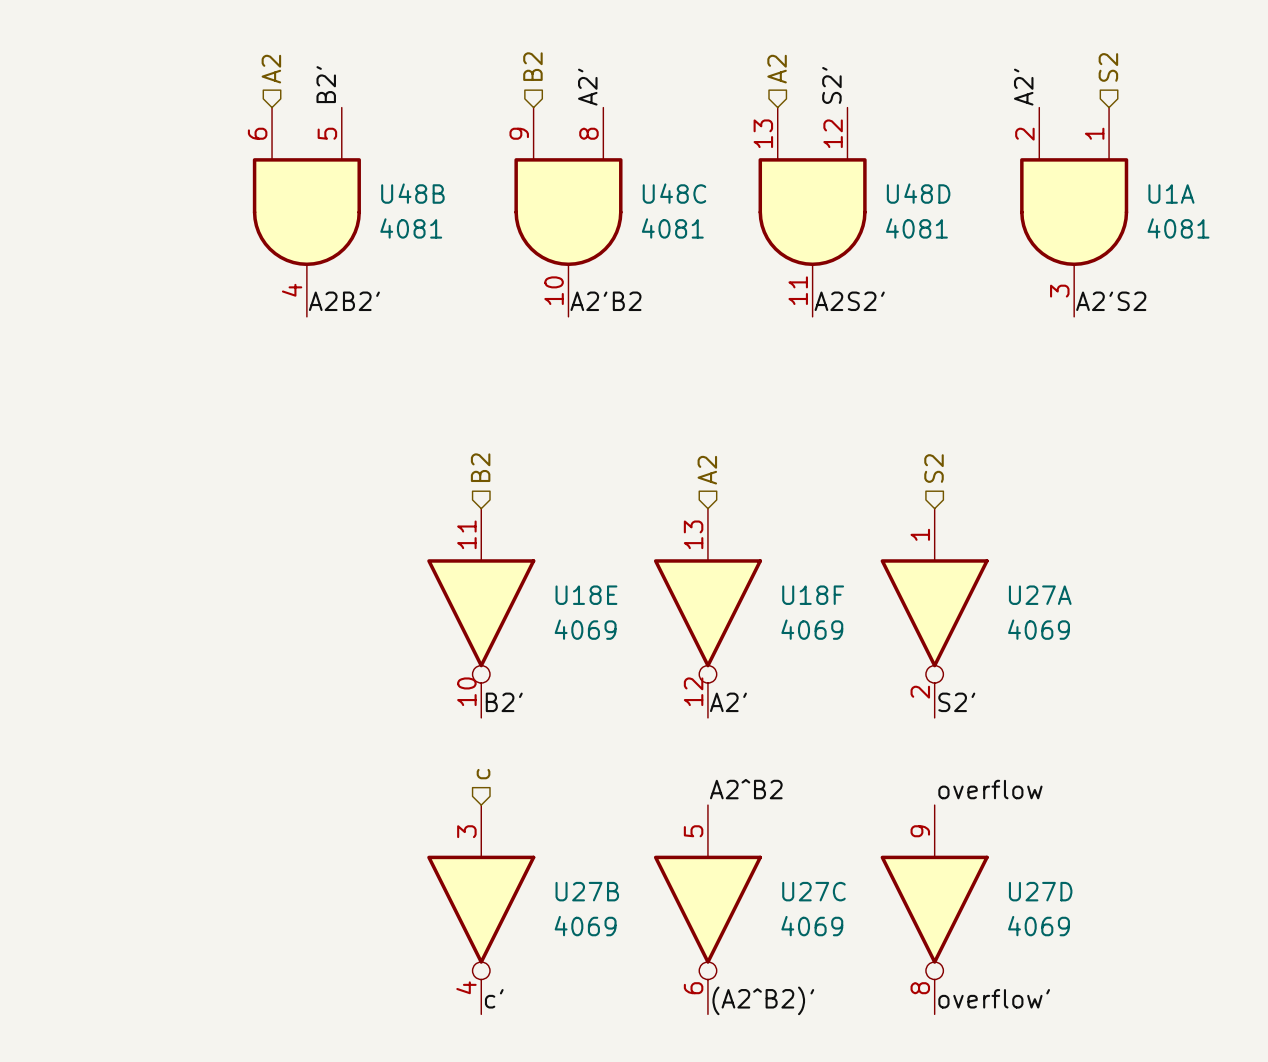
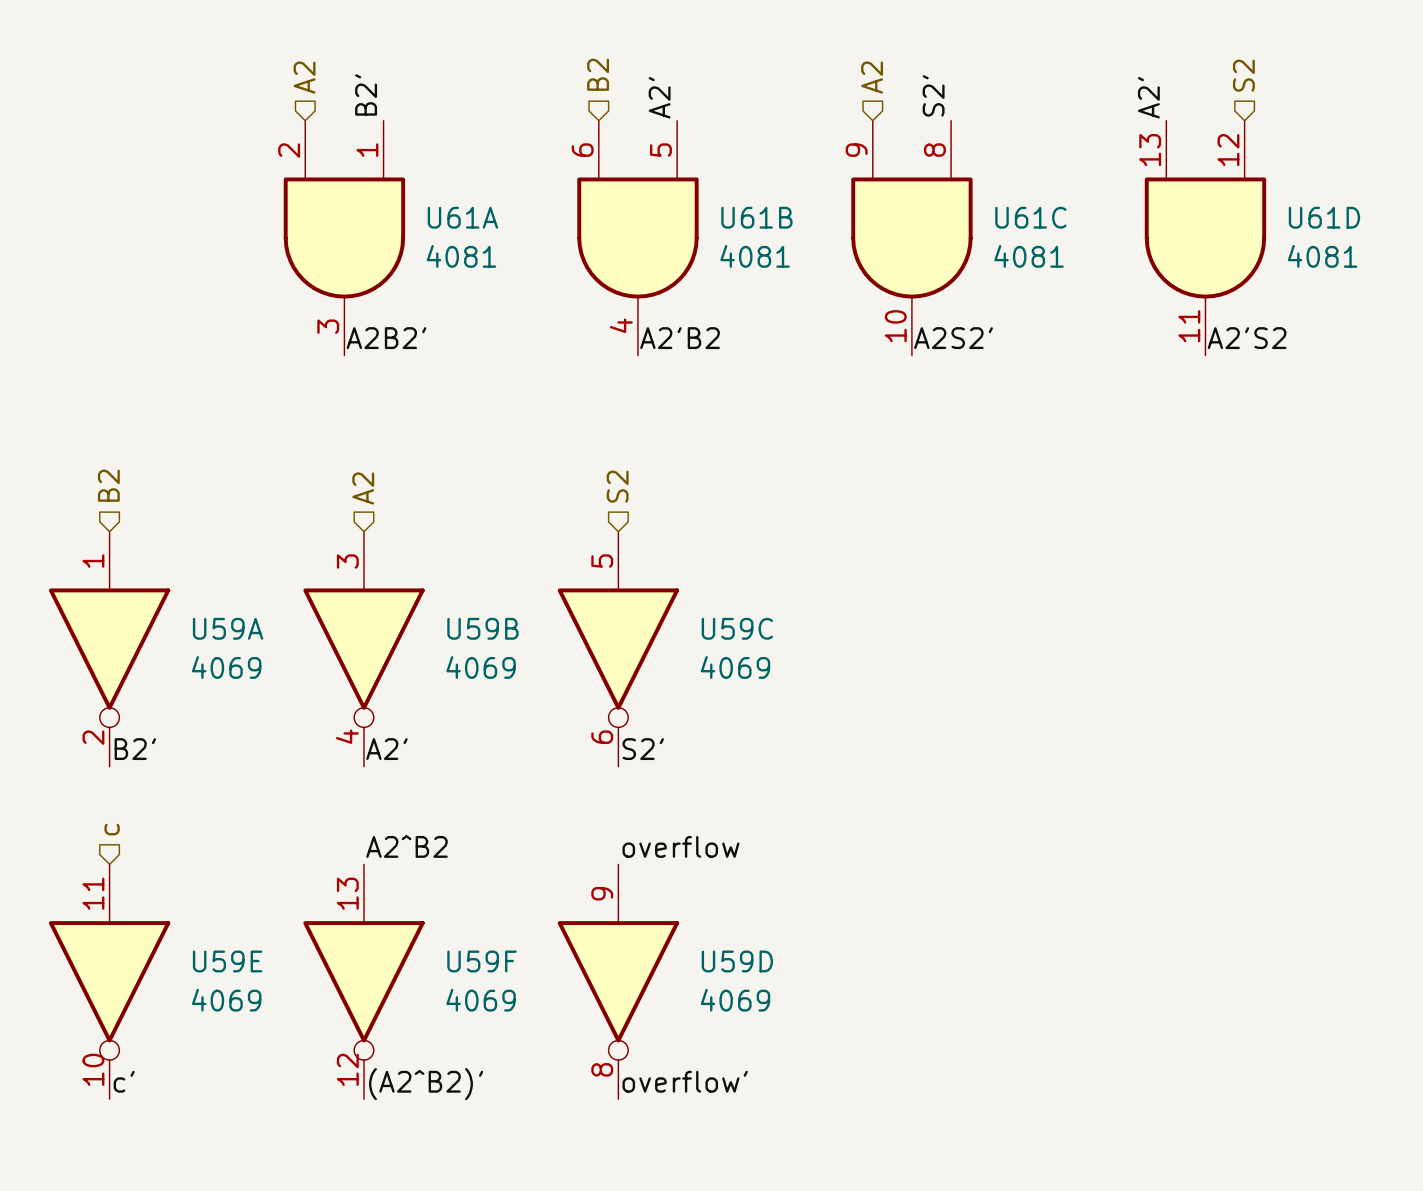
U48B pin number: 6 (257, 133) -> 2 (289, 150)
U48B pin number: 5 (327, 133) -> 1 (367, 150)
U48C pin number: 9 (519, 133) -> 6 (582, 150)
U48C pin number: 8 (588, 133) -> 5 (660, 150)
U48D pin number: 13 (763, 133) -> 9 (856, 150)
U48D pin number: 12 (833, 133) -> 8 (934, 150)
U1A pin number: 1 (1094, 133) -> 12 (1228, 150)
U1A pin number: 2 (1024, 134) -> 13 (1150, 150)
U48B name: U48B (412, 193) -> U61A (462, 217)
U48C name: U48C (674, 193) -> U61B (756, 217)
U48D name: U48D (918, 193) -> U61C (1030, 217)
U1A name: U1A (1171, 194) -> U61D (1324, 217)
U48B pin number: 4 (292, 290) -> 3 (328, 326)
U48C pin number: 10 (554, 290) -> 4 (621, 325)
U48D pin number: 11 (798, 290) -> 10 (895, 326)
U1A pin number: 3 (1059, 291) -> 11 (1189, 326)
hierarchical label: none -> B2 (108, 485)
hierarchical label: none -> S2 (617, 486)
hierarchical label: none -> A2 (363, 488)
hierarchical label: B2 (480, 467) -> none
hierarchical label: S2 (934, 468) -> none
hierarchical label: A2 (707, 470) -> none
U59A: none -> 4069 (109, 649)
U59B: none -> 4069 (363, 649)
U59C: none -> 4069 (618, 649)
U18E: 4069 (481, 613) -> none
U18F: 4069 (707, 613) -> none
U27A: 4069 (934, 613) -> none
label: none -> B2' (135, 749)
label: none -> A2' (386, 749)
label: none -> S2' (643, 749)
label: B2' (504, 702) -> none
label: A2' (728, 702) -> none
label: S2' (956, 702) -> none
hierarchical label: none -> c (112, 829)
label: none -> A2^B2 (406, 846)
label: none -> overflow (680, 846)
hierarchical label: c (483, 774) -> none
label: A2^B2 (746, 789) -> none
label: overflow (990, 789) -> none
U59E: none -> 4069 (109, 981)
U59F: none -> 4069 (363, 981)
U59D: none -> 4069 (618, 981)
U27B: 4069 (481, 909) -> none
U27C: 4069 (707, 909) -> none
U27D: 4069 (934, 909) -> none
label: none -> c' (124, 1081)
label: none -> overflow' (685, 1081)
label: none -> (A2^B2)' (426, 1084)
label: c' (494, 998) -> none
label: overflow' (994, 998) -> none
label: (A2^B2)' (763, 1000) -> none

